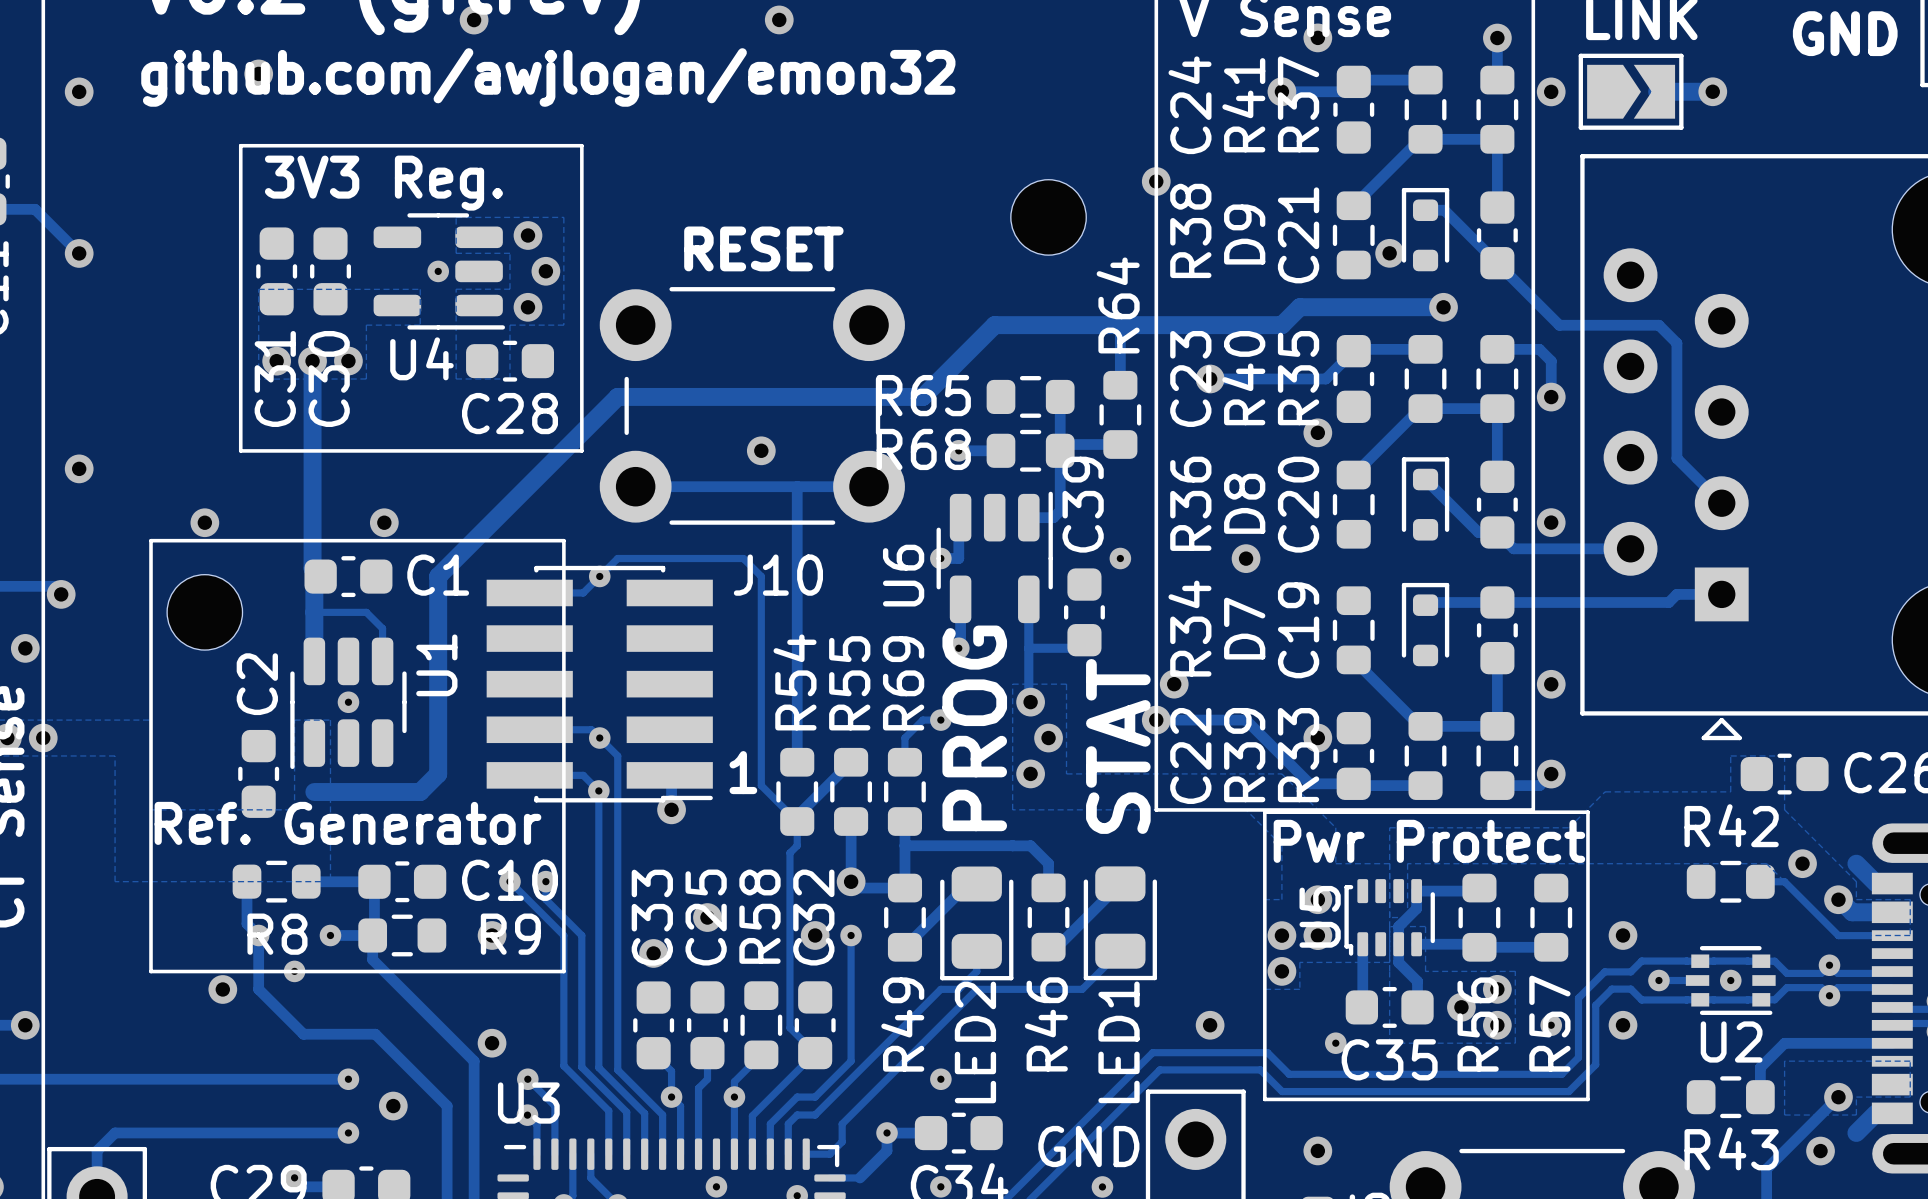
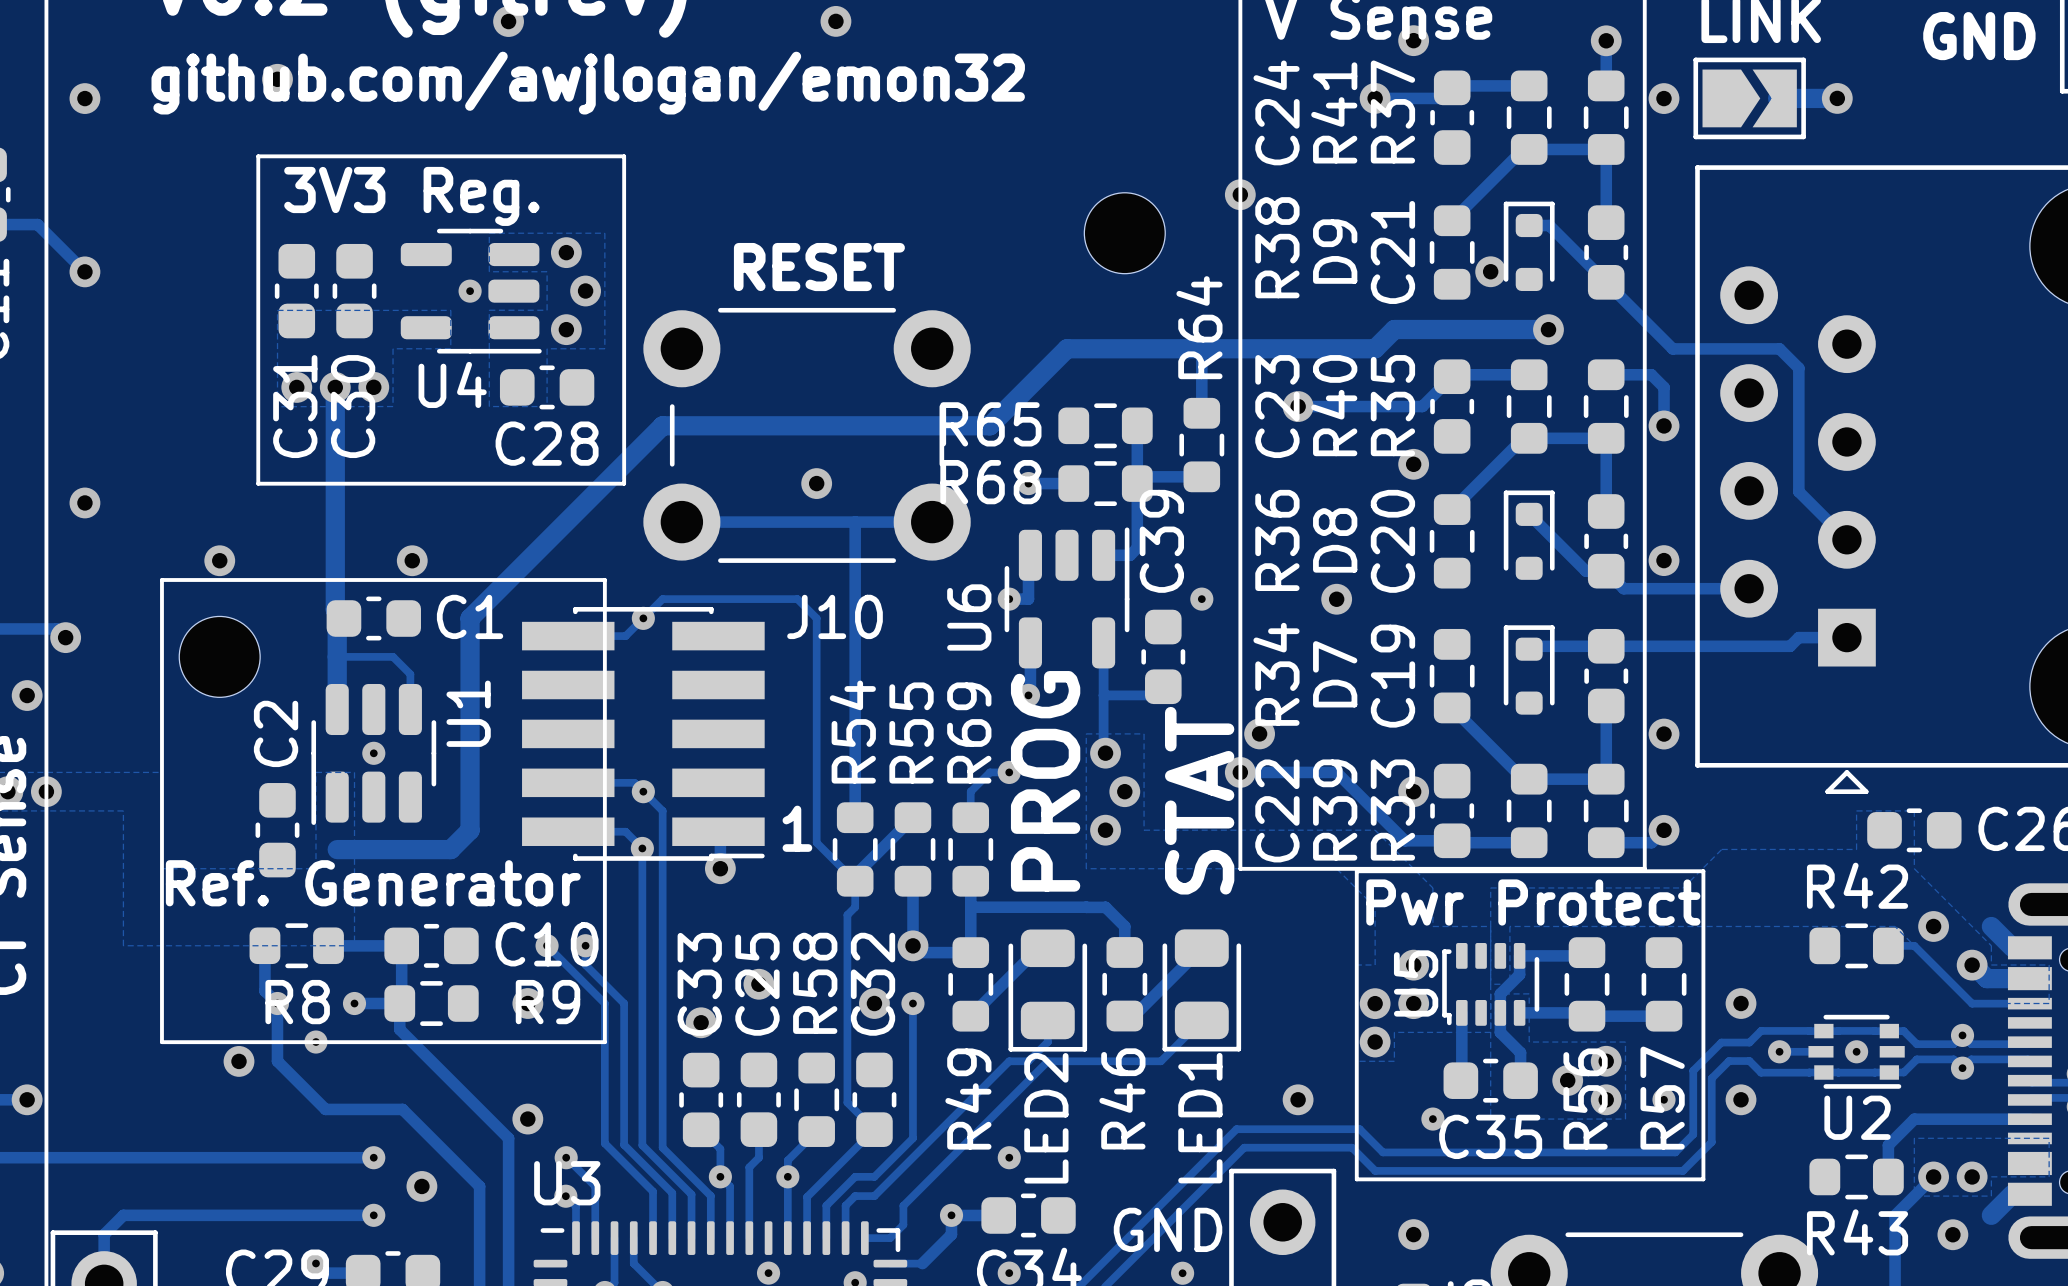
via: none -> (1933, 1176)
track: (1838, 1097) (1766, 1169) -> (1933, 1176) (1895, 1215) (1895, 1254)

